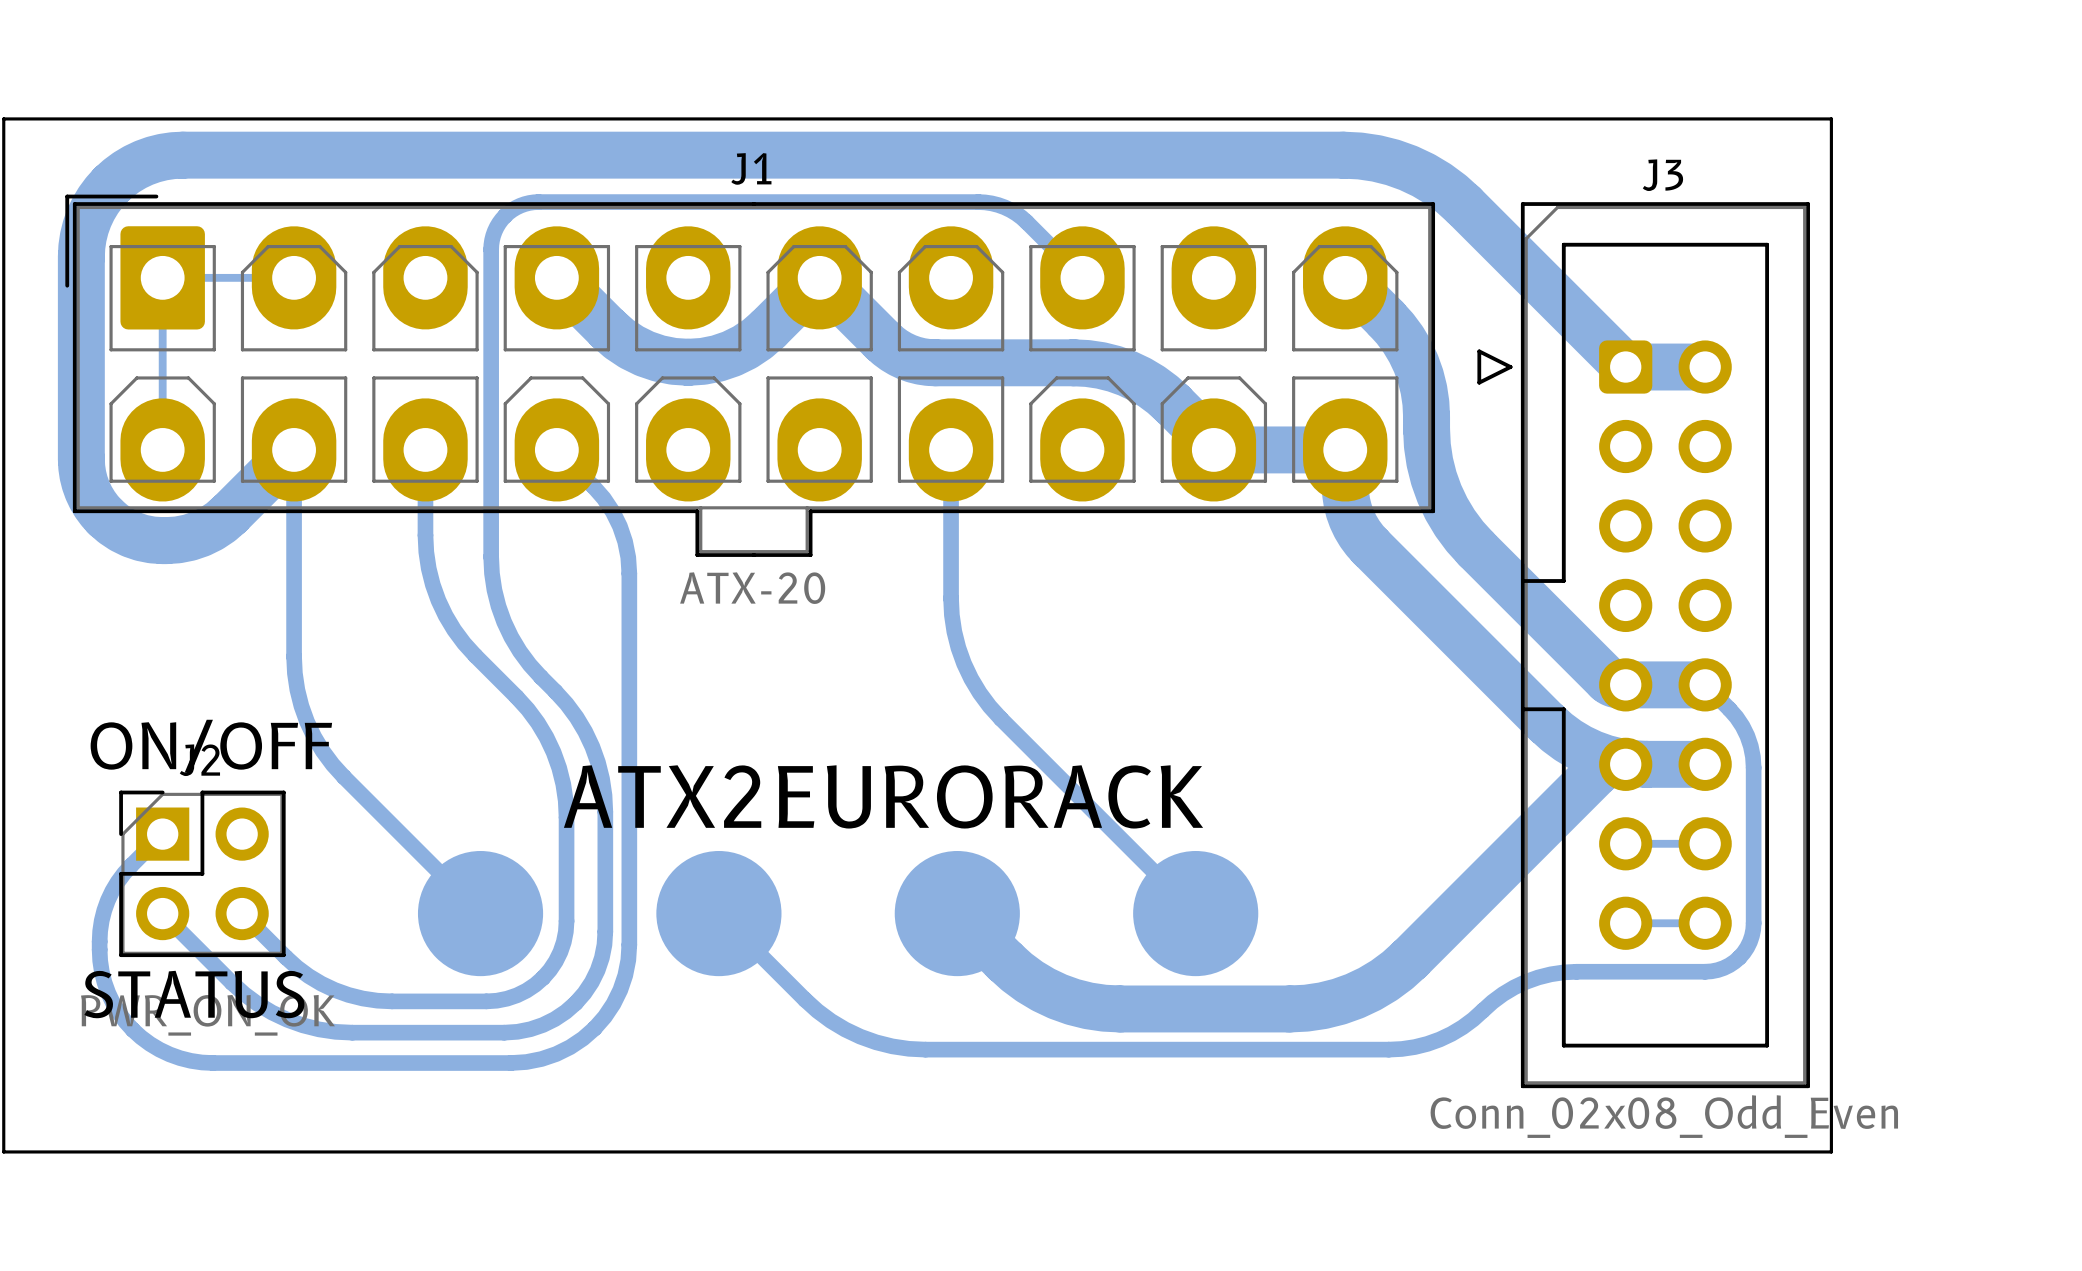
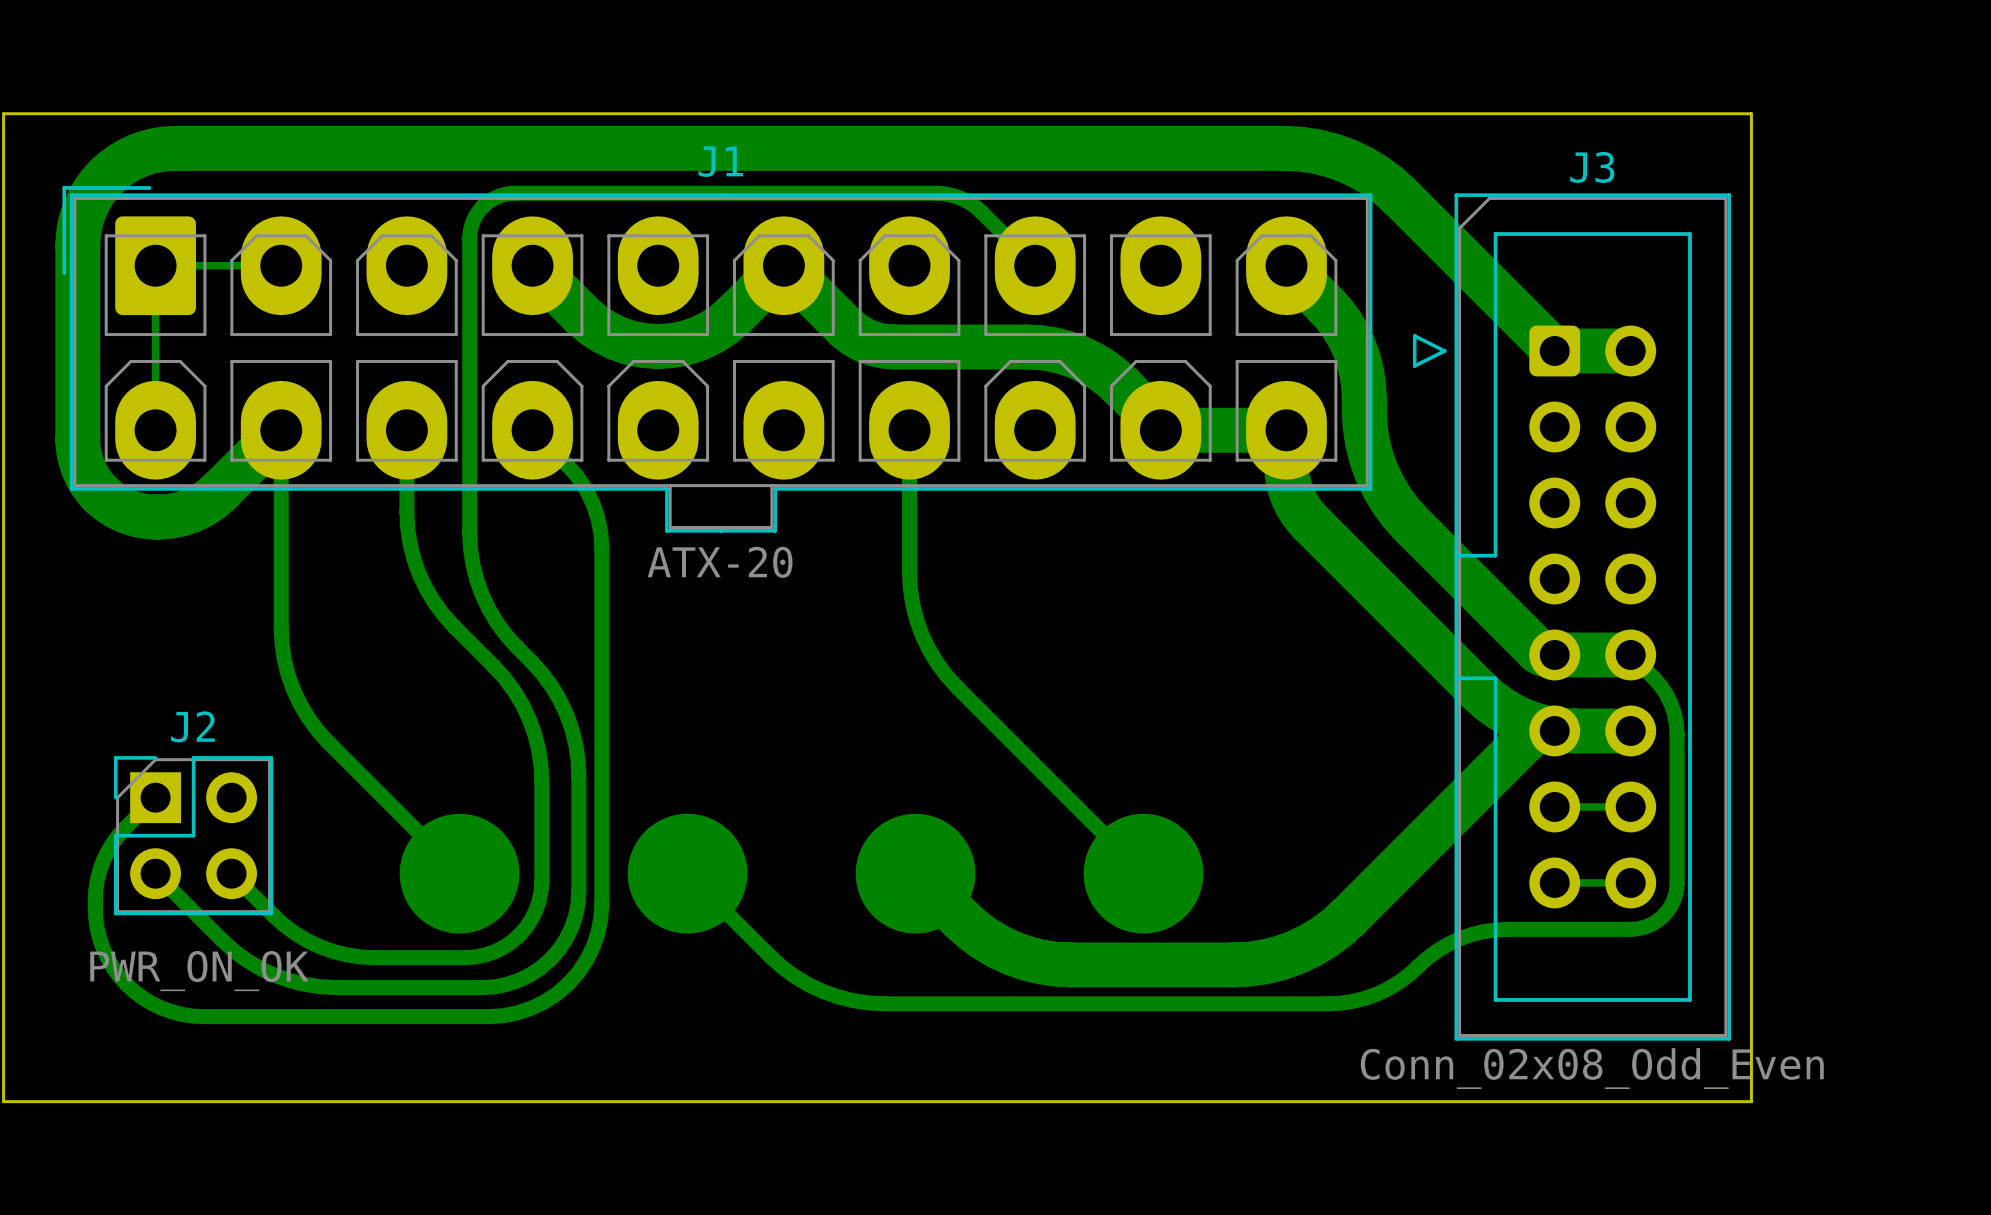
text: ON/OFF (211, 746) -> none
text: ATX2EURORACK (883, 796) -> none
text: STATUS (194, 994) -> none

